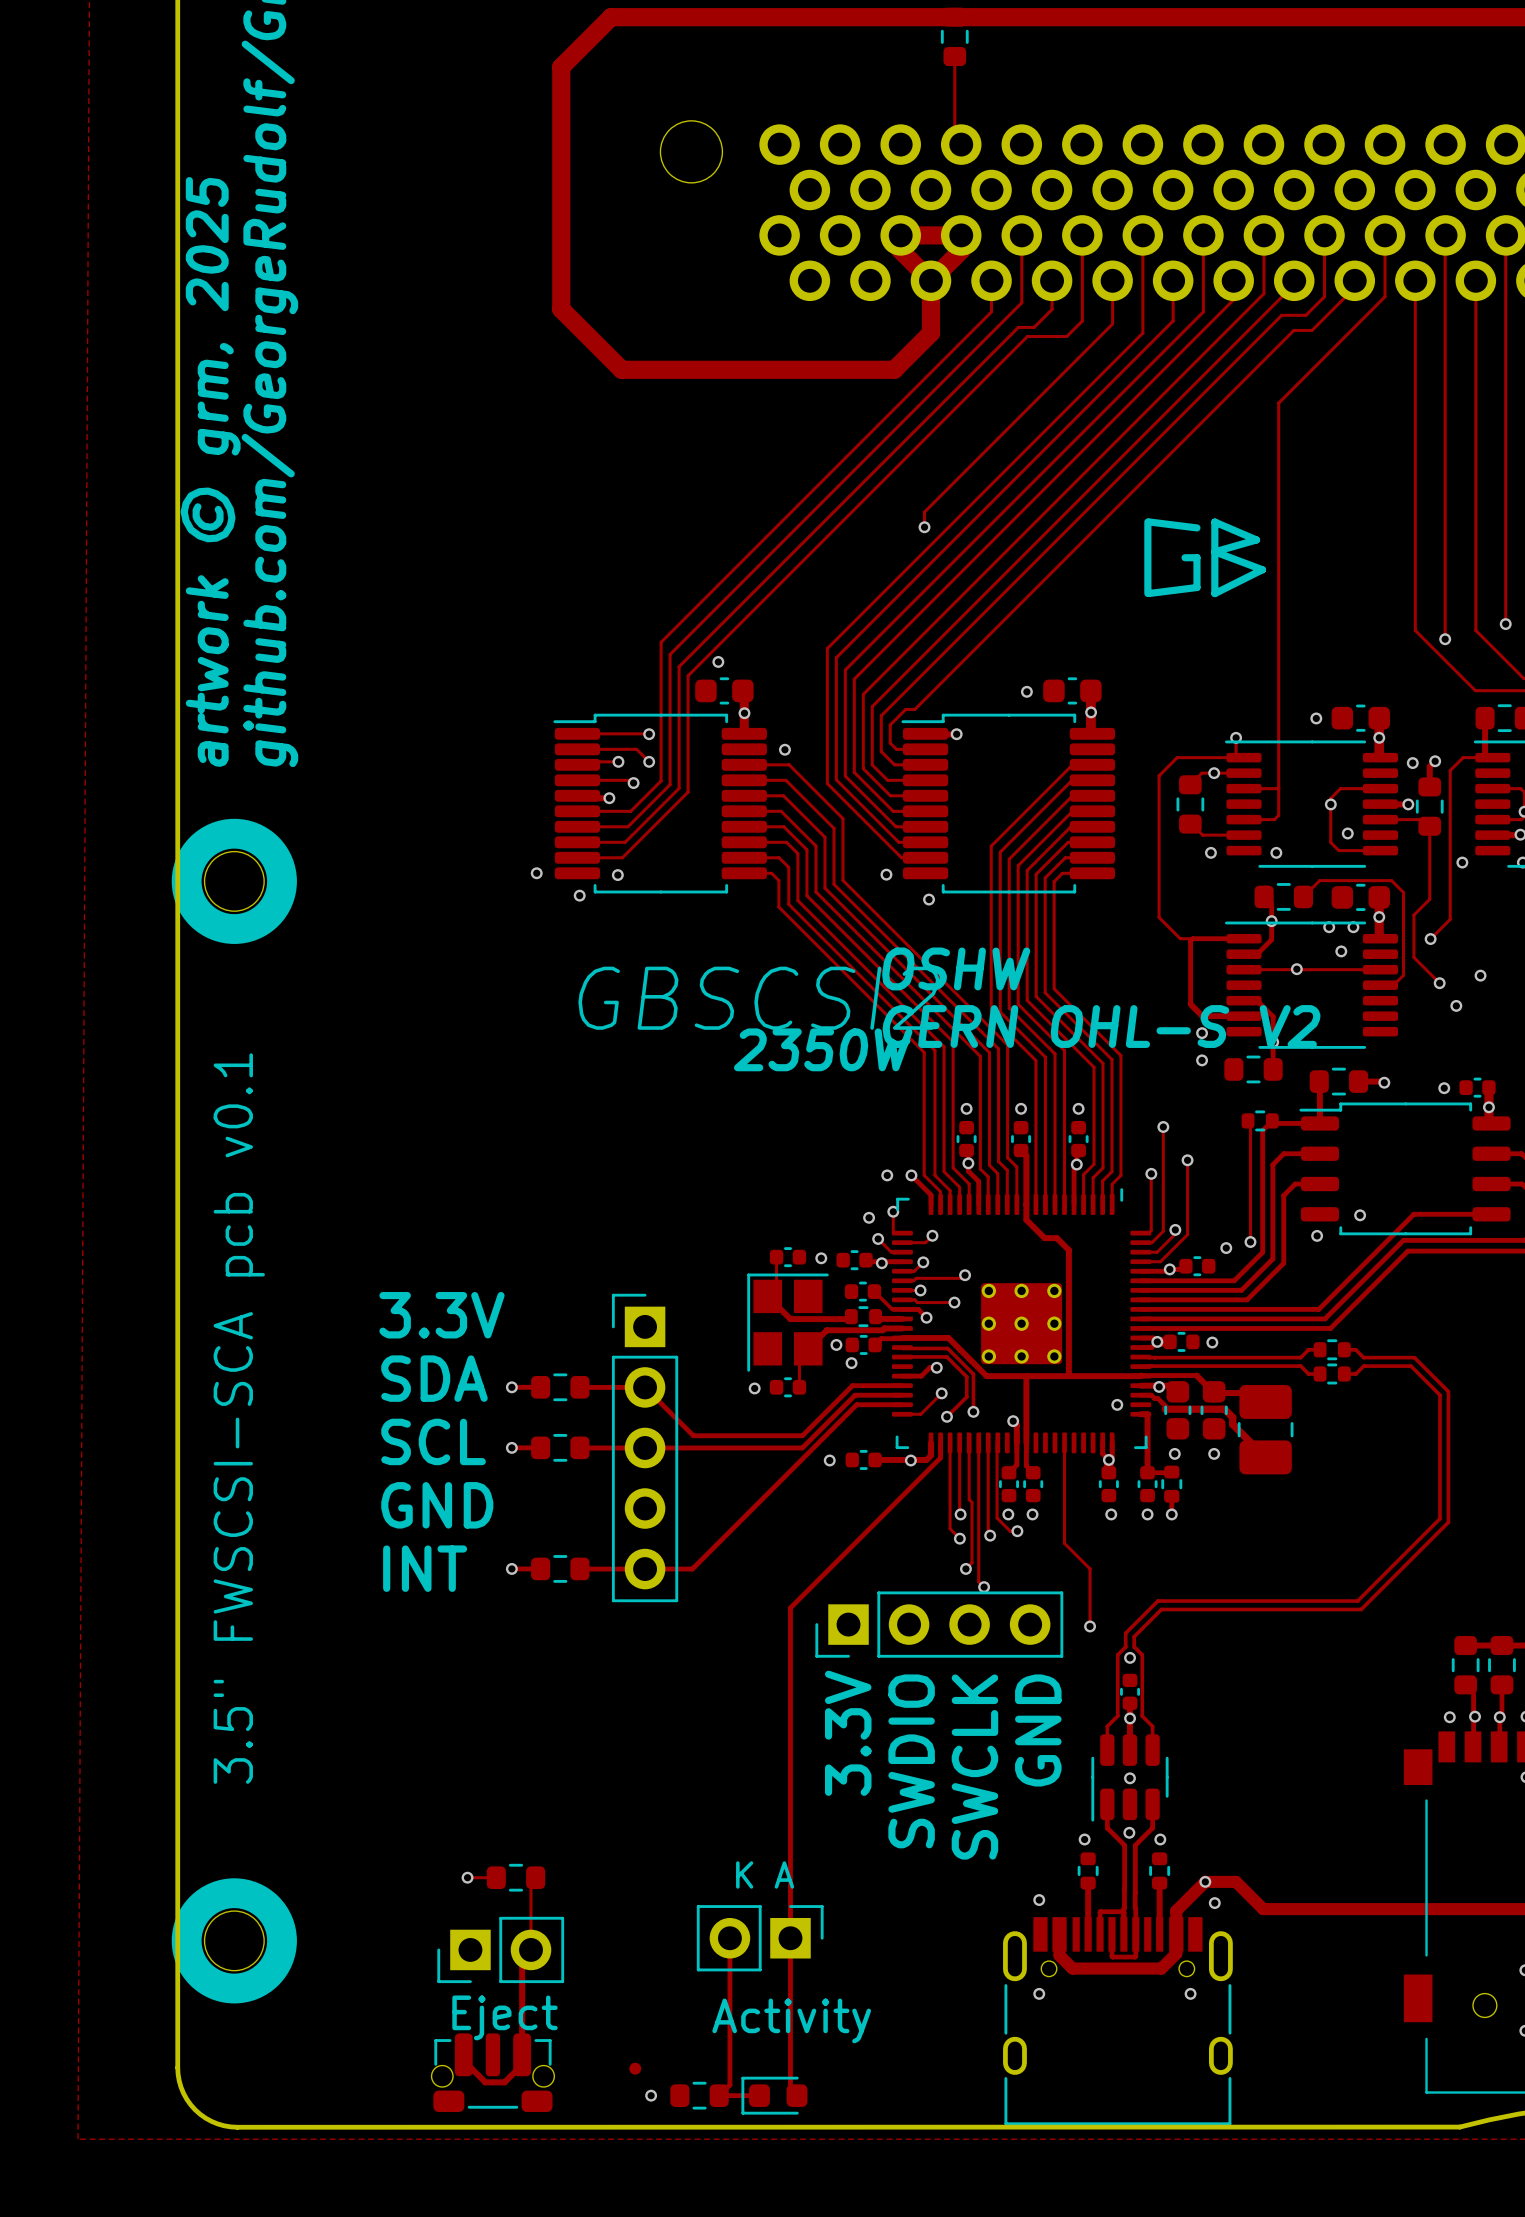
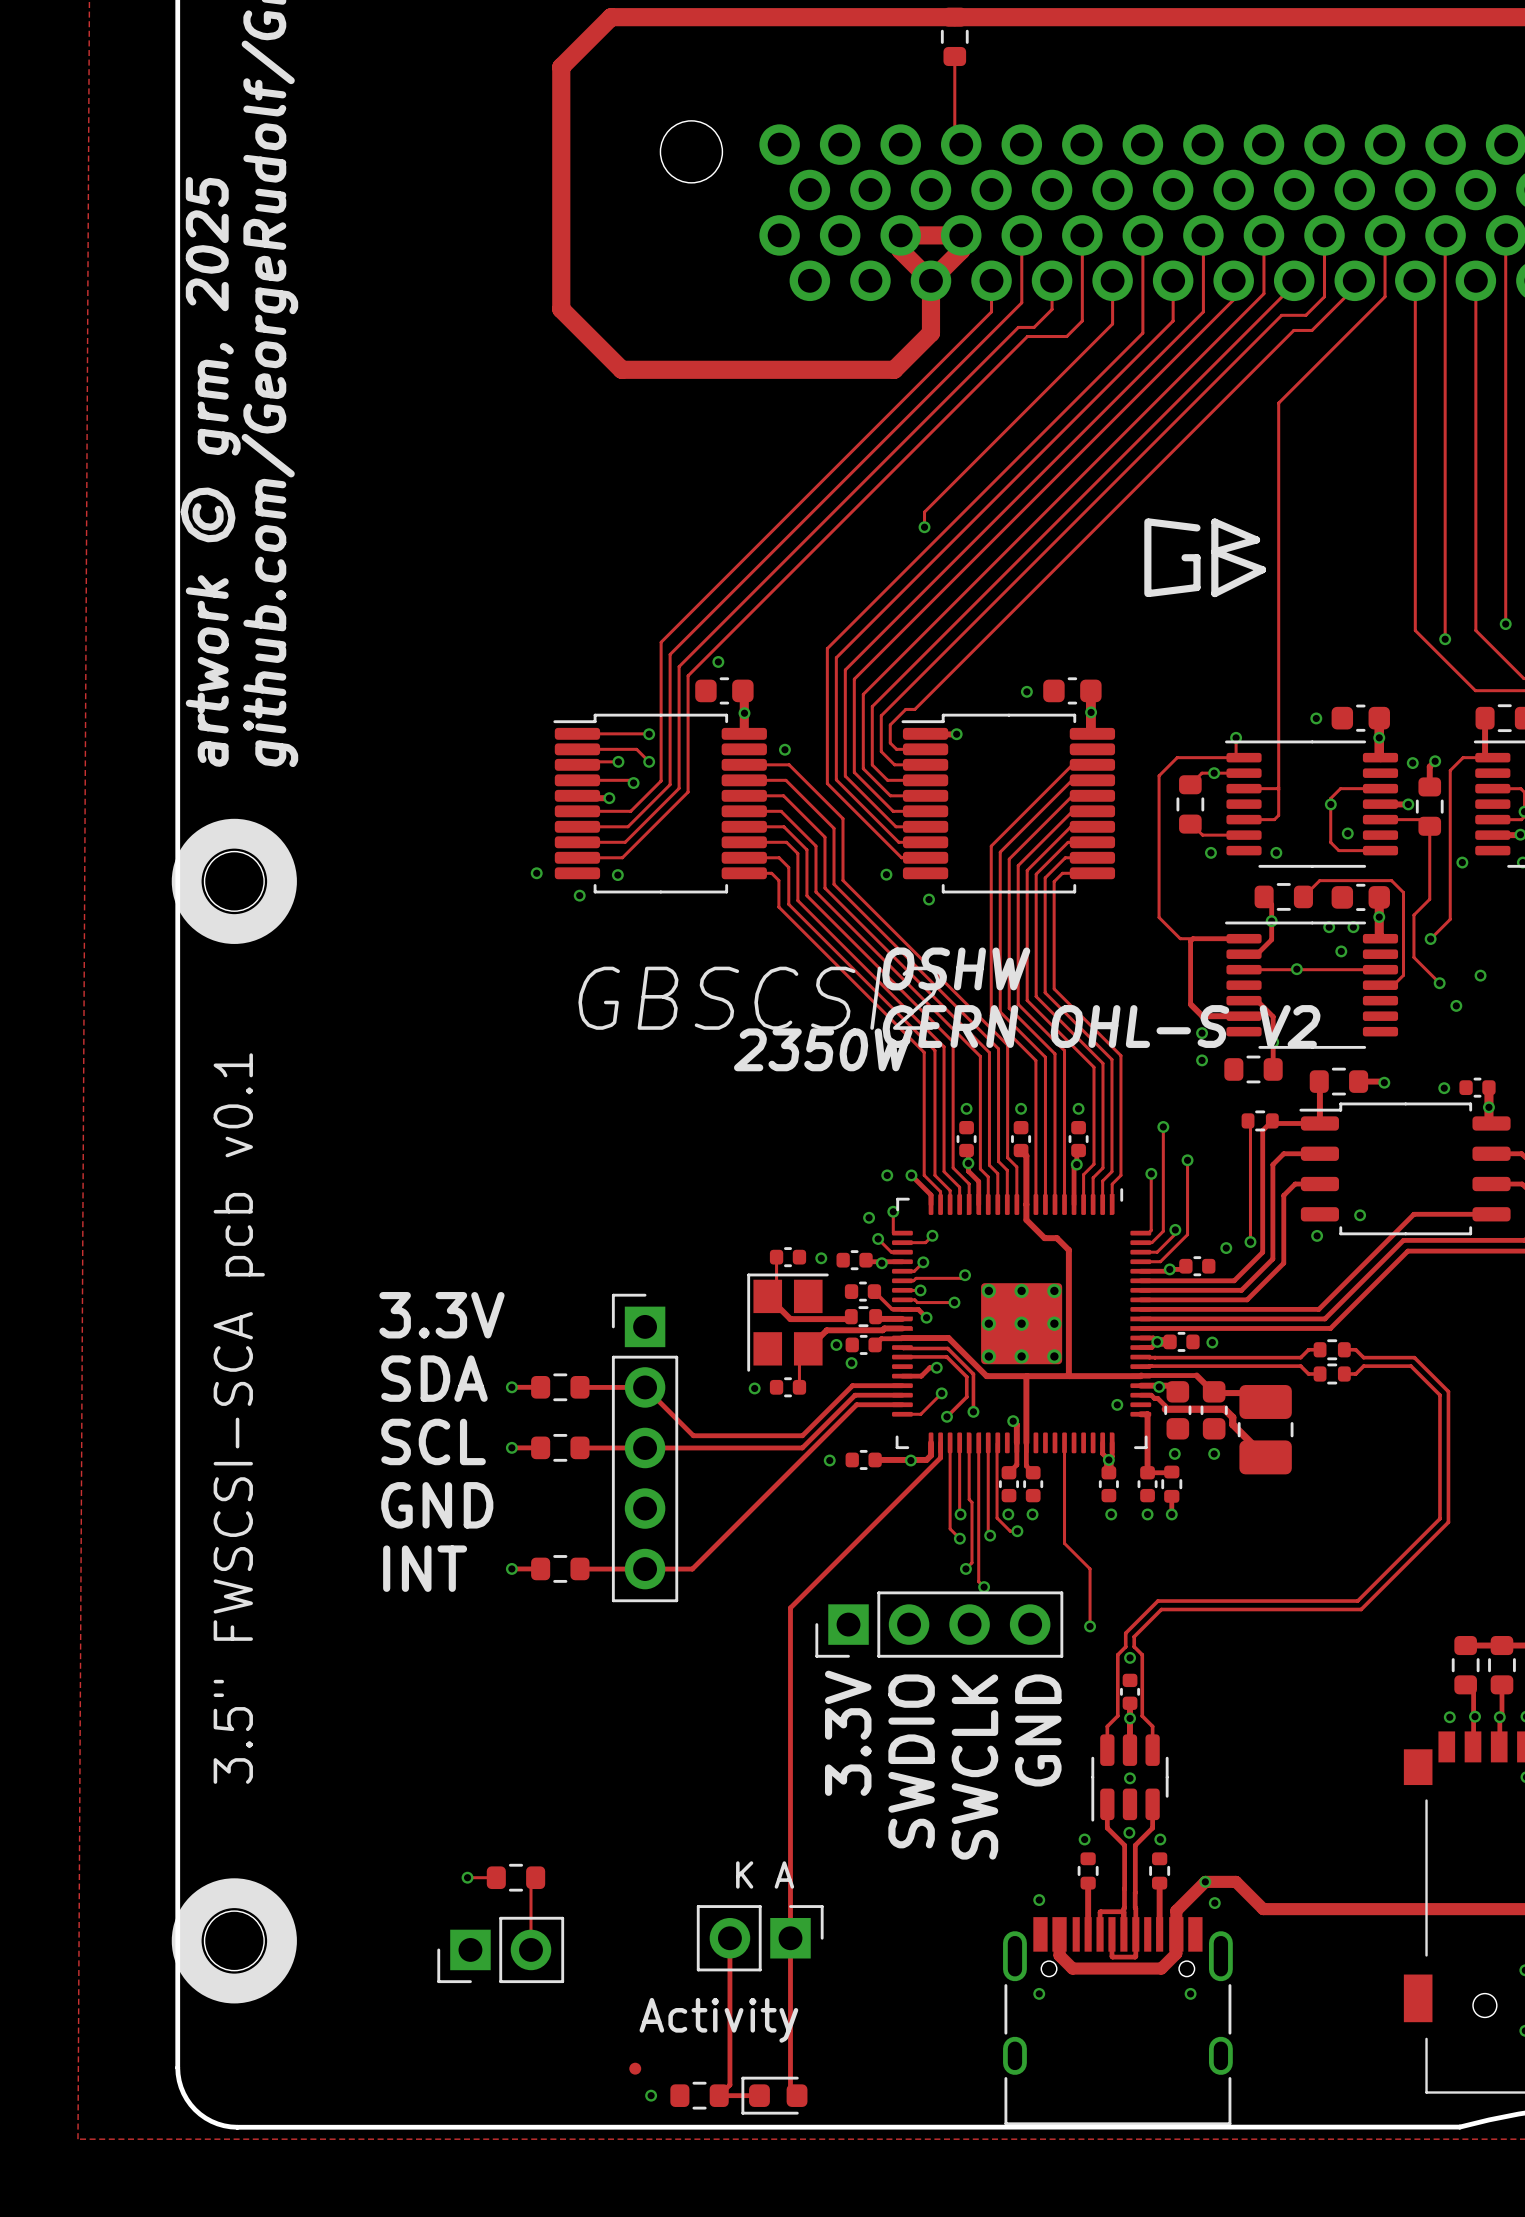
track: (531, 1949) (522, 1958) (522, 2064) (504, 2082) (485, 2082) (463, 2060) (463, 2054) -> none
text: Eject (504, 2017) -> none
text position: Activity (791, 2020) -> Activity (718, 2020)
part: (492, 2072) -> none

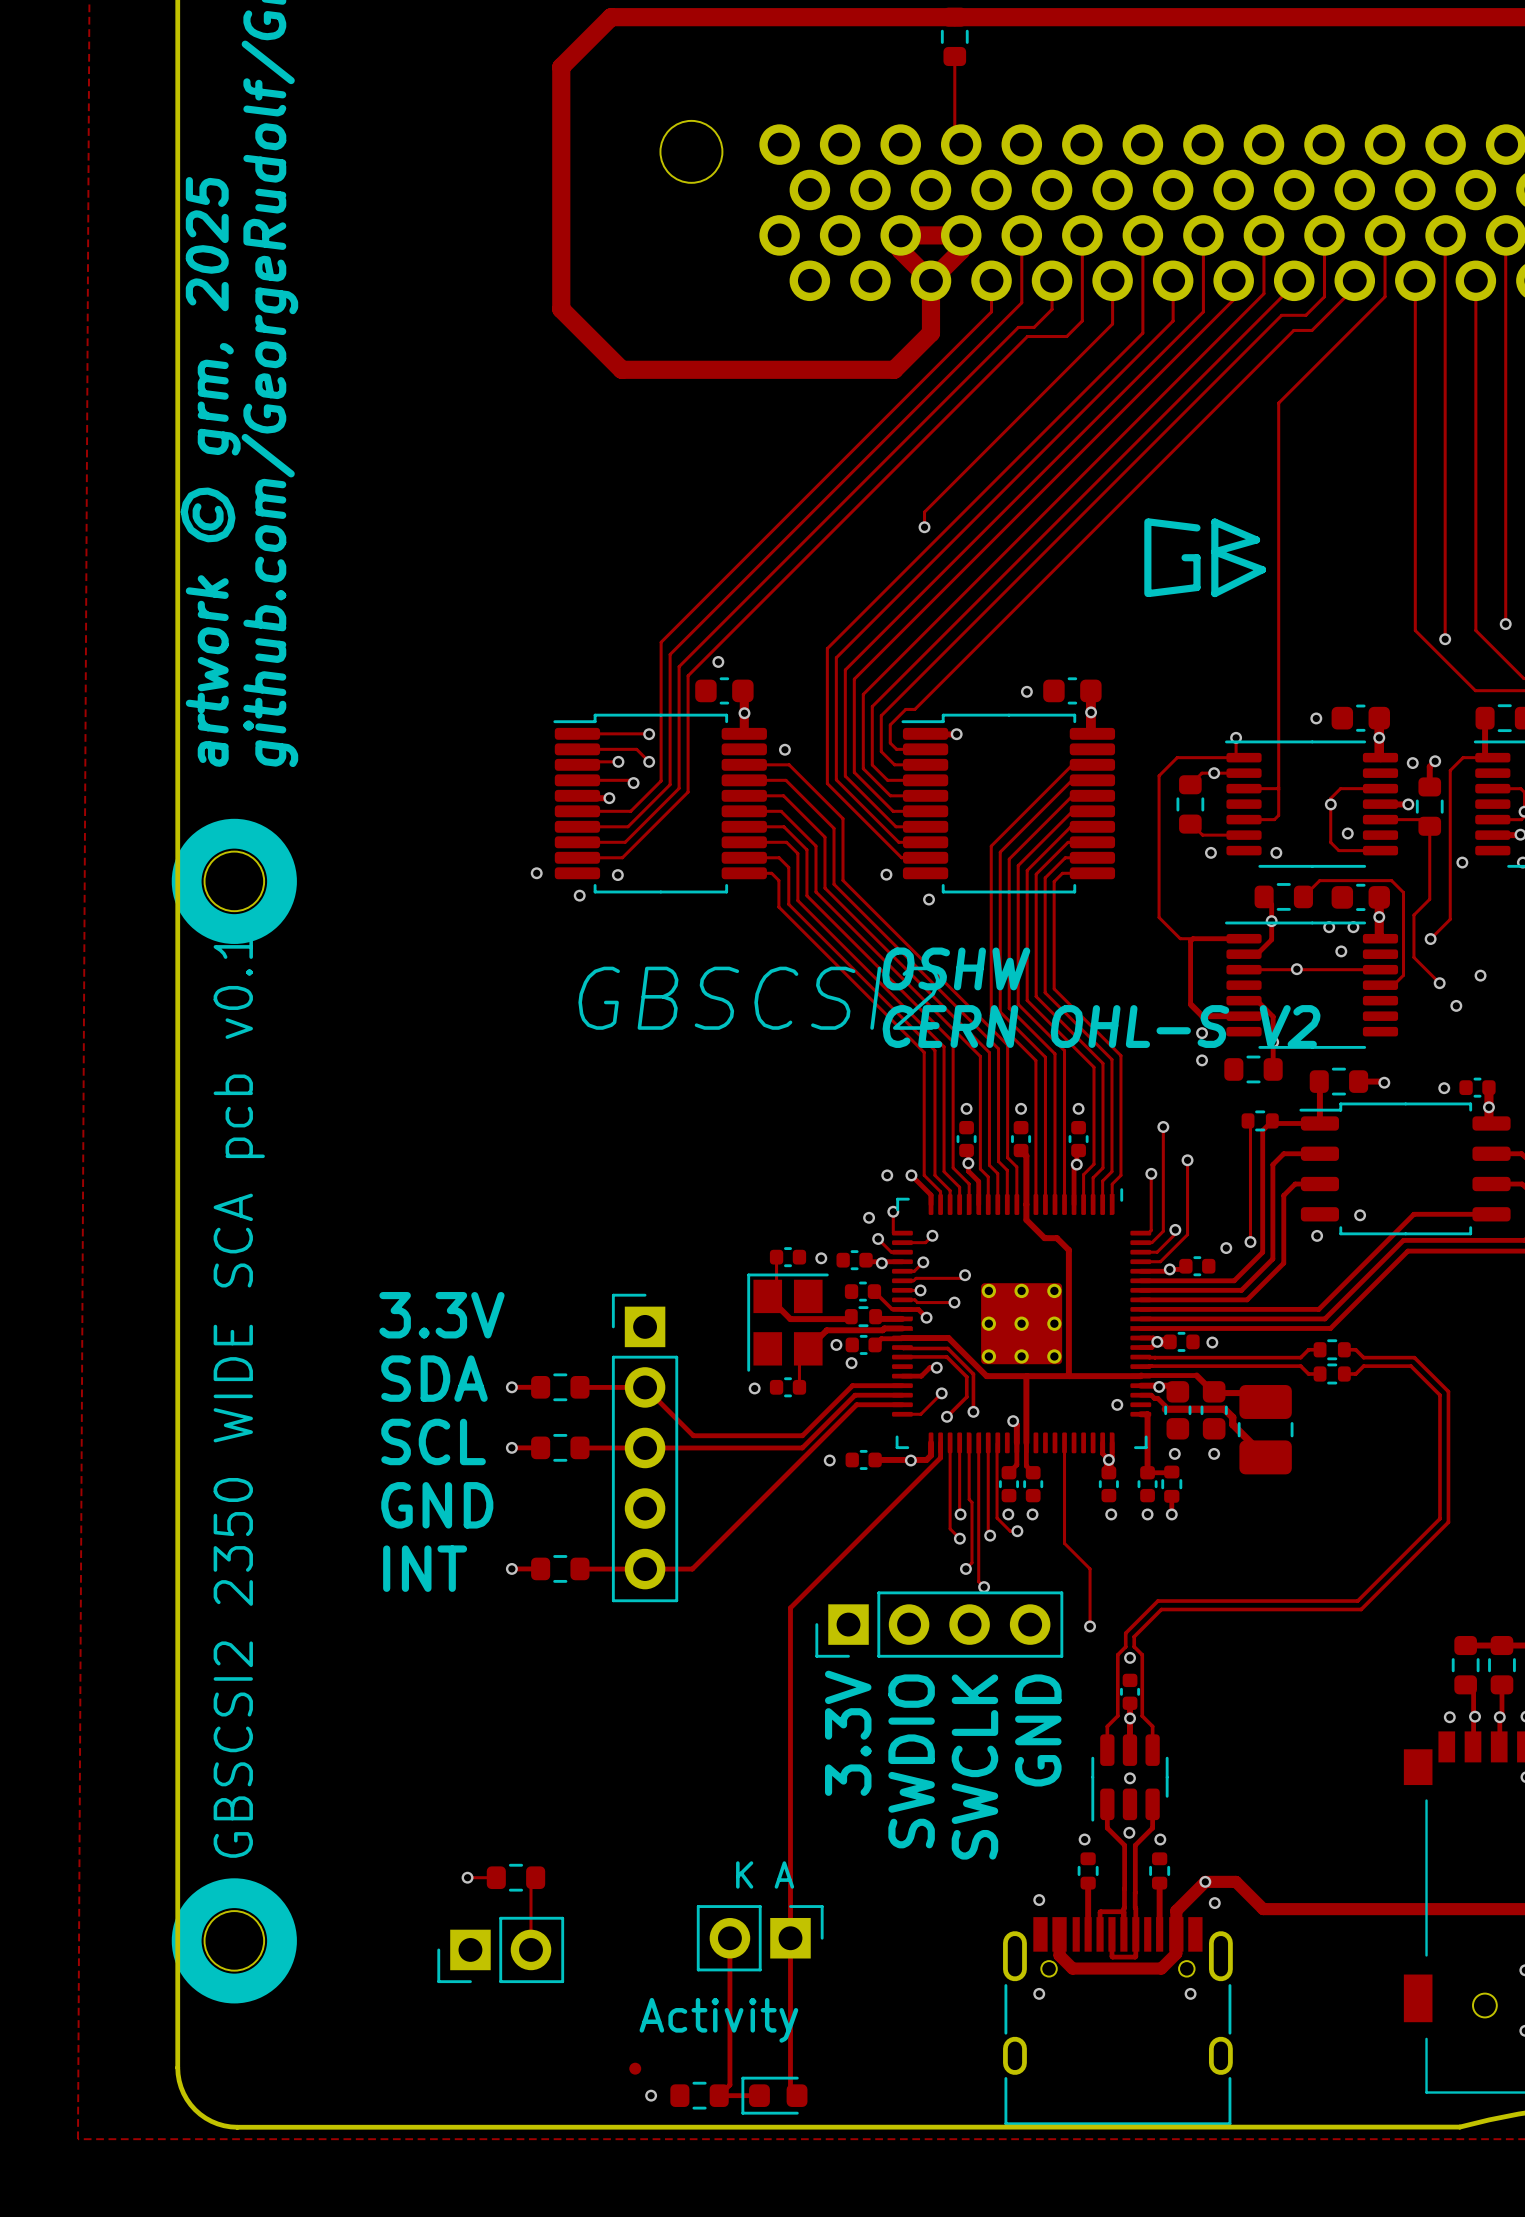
text: 2350W (823, 1049) -> none
text: none -> GBSCSI2 2350 WIDE SCA pcb v0.1 (239, 1396)
text: 3.5" FWSCSI-SCA pcb v0.1 (239, 1418) -> none

